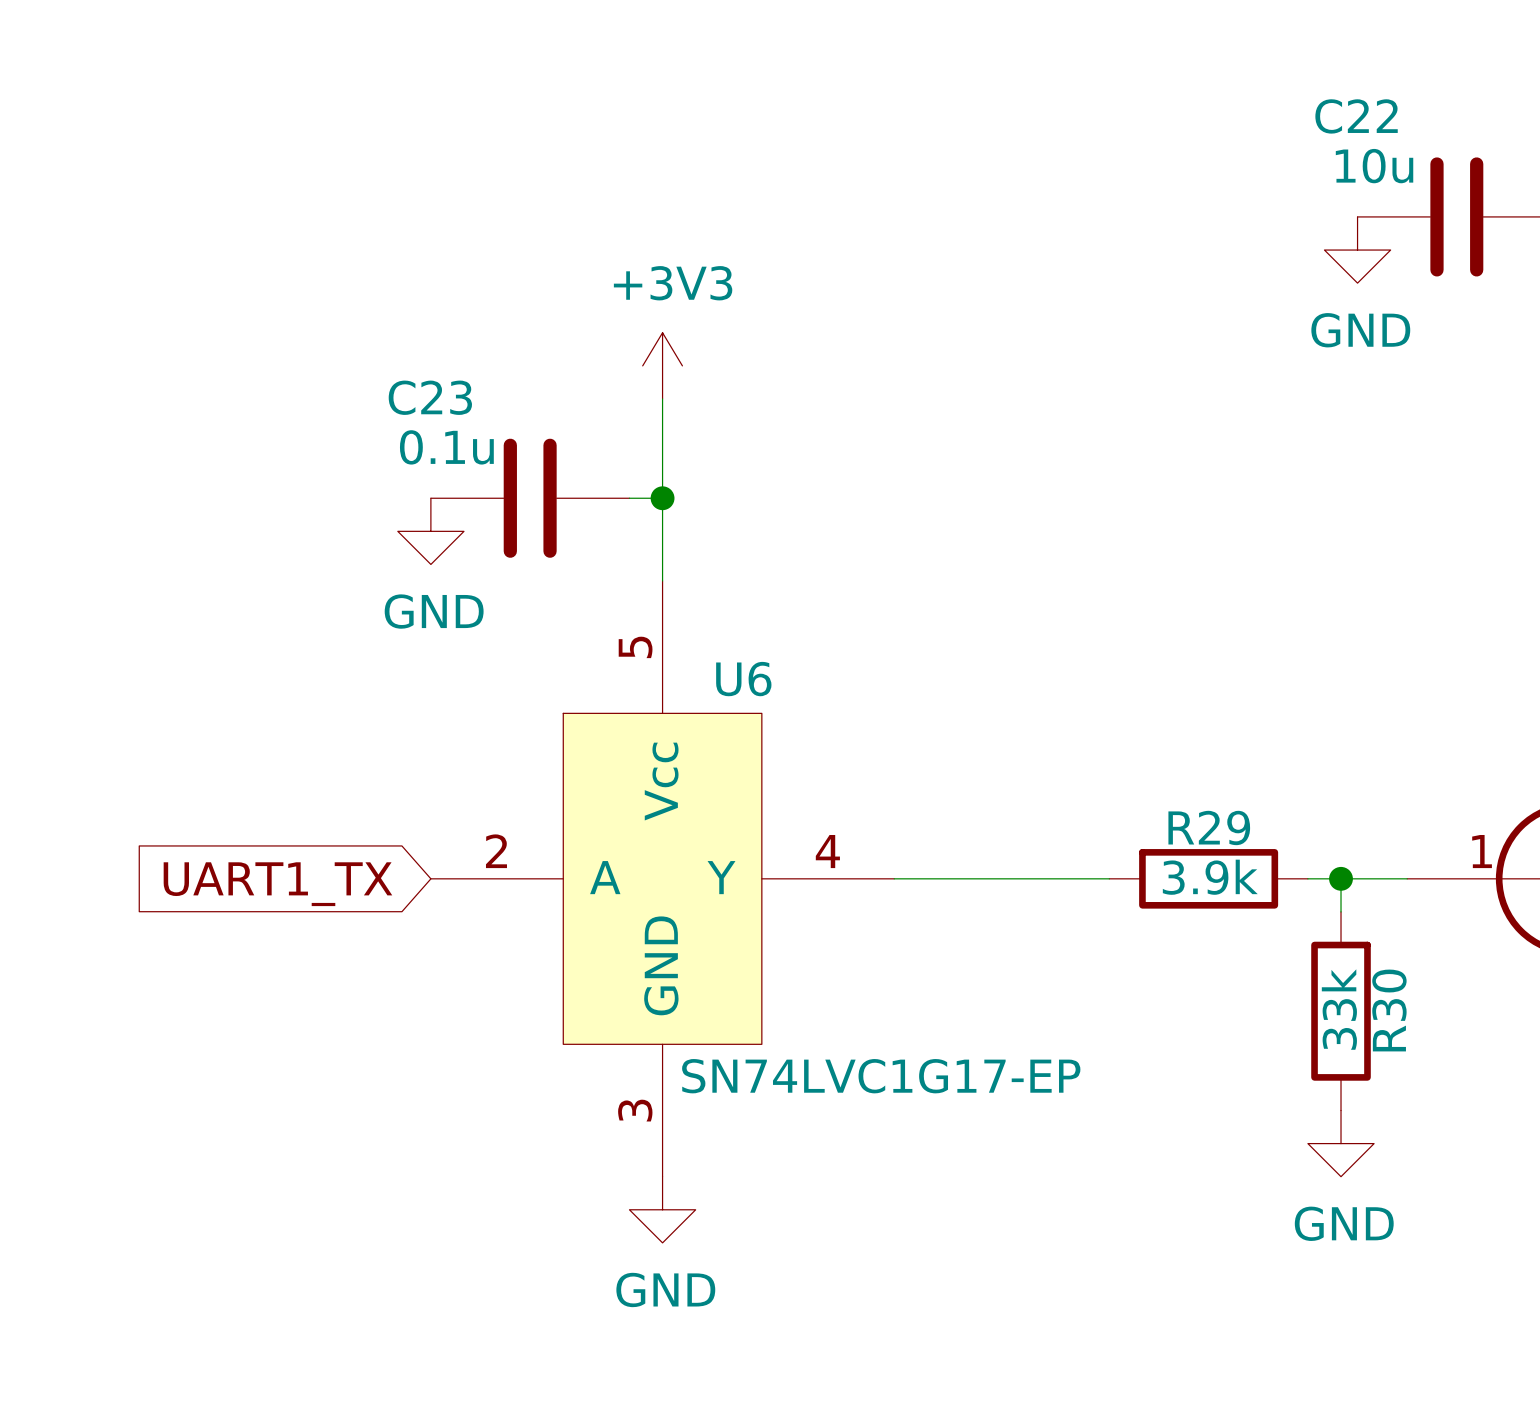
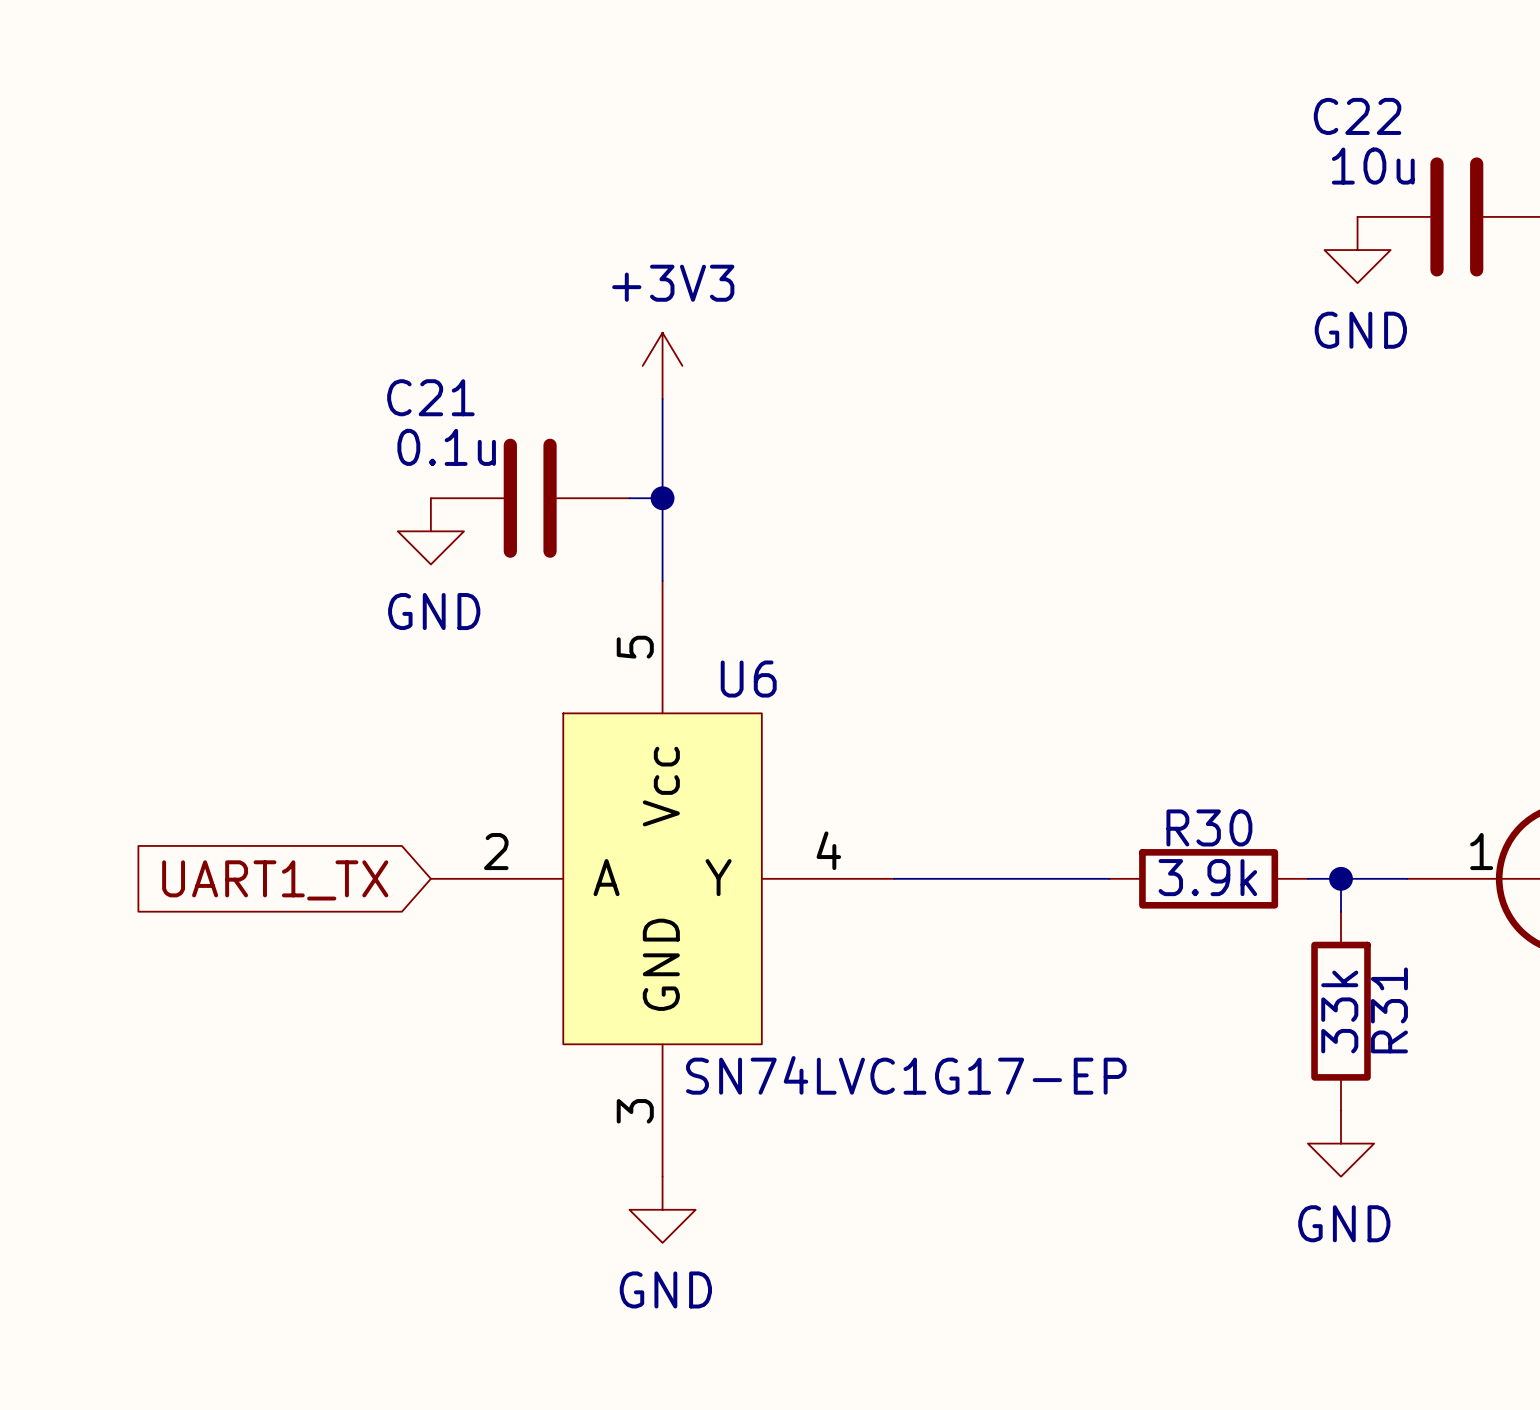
C23 name: C23 (430, 397) -> C21 (430, 397)
R29 name: R29 (1209, 827) -> R30 (1209, 827)
R30 name: R30 (1389, 1010) -> R31 (1389, 1010)

